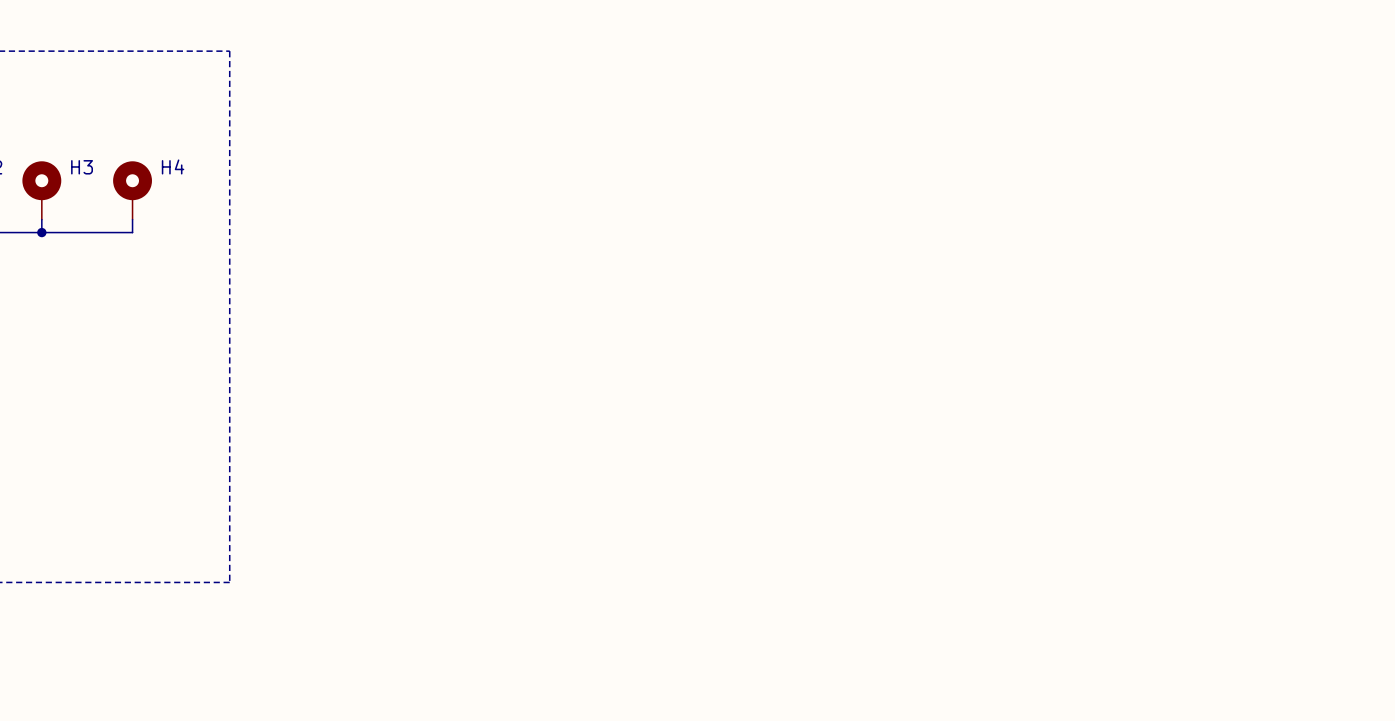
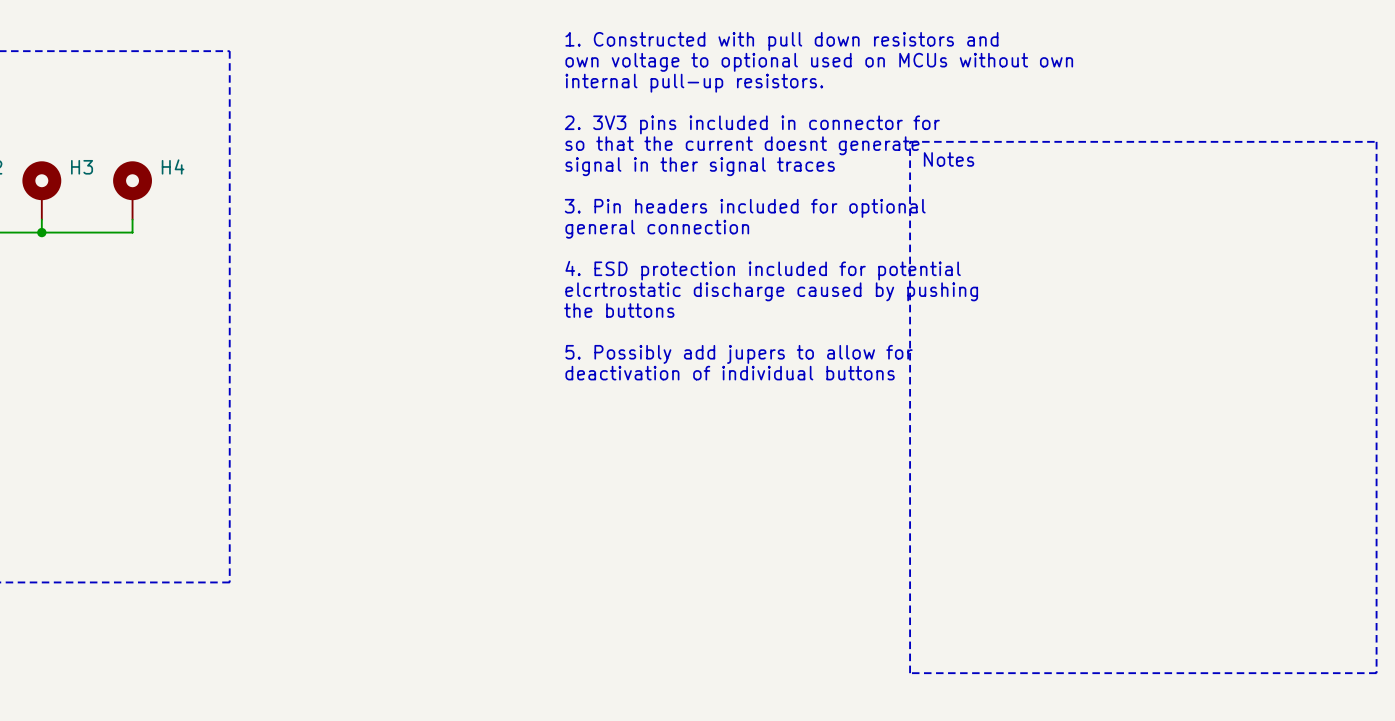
text: none -> 1. Constructed with pull down resistors and (781, 41)
text: none -> own voltage to optional used on MCUs without own (819, 62)
text: none -> internal pull-up resistors. (694, 83)
text: none -> 2. 3V3 pins included in connector for (752, 124)
line: none -> (910, 141) (1376, 141) (1376, 673) (910, 673) (910, 141)
text: none -> so that the current doesnt generate (742, 145)
text: none -> Notes (949, 159)
text: none -> signal in ther signal traces (700, 166)
text: none -> 3. Pin headers included for optional (745, 208)
text: none -> general connection (657, 229)
text: none -> 4. ESD protection included for potential (763, 270)
text: none -> elcrtrostatic discharge caused by pushing (771, 291)
text: none -> the buttons (619, 310)
text: none -> 5. Possibly add jupers to allow for (739, 354)
text: none -> deactivation of individual buttons (730, 373)

